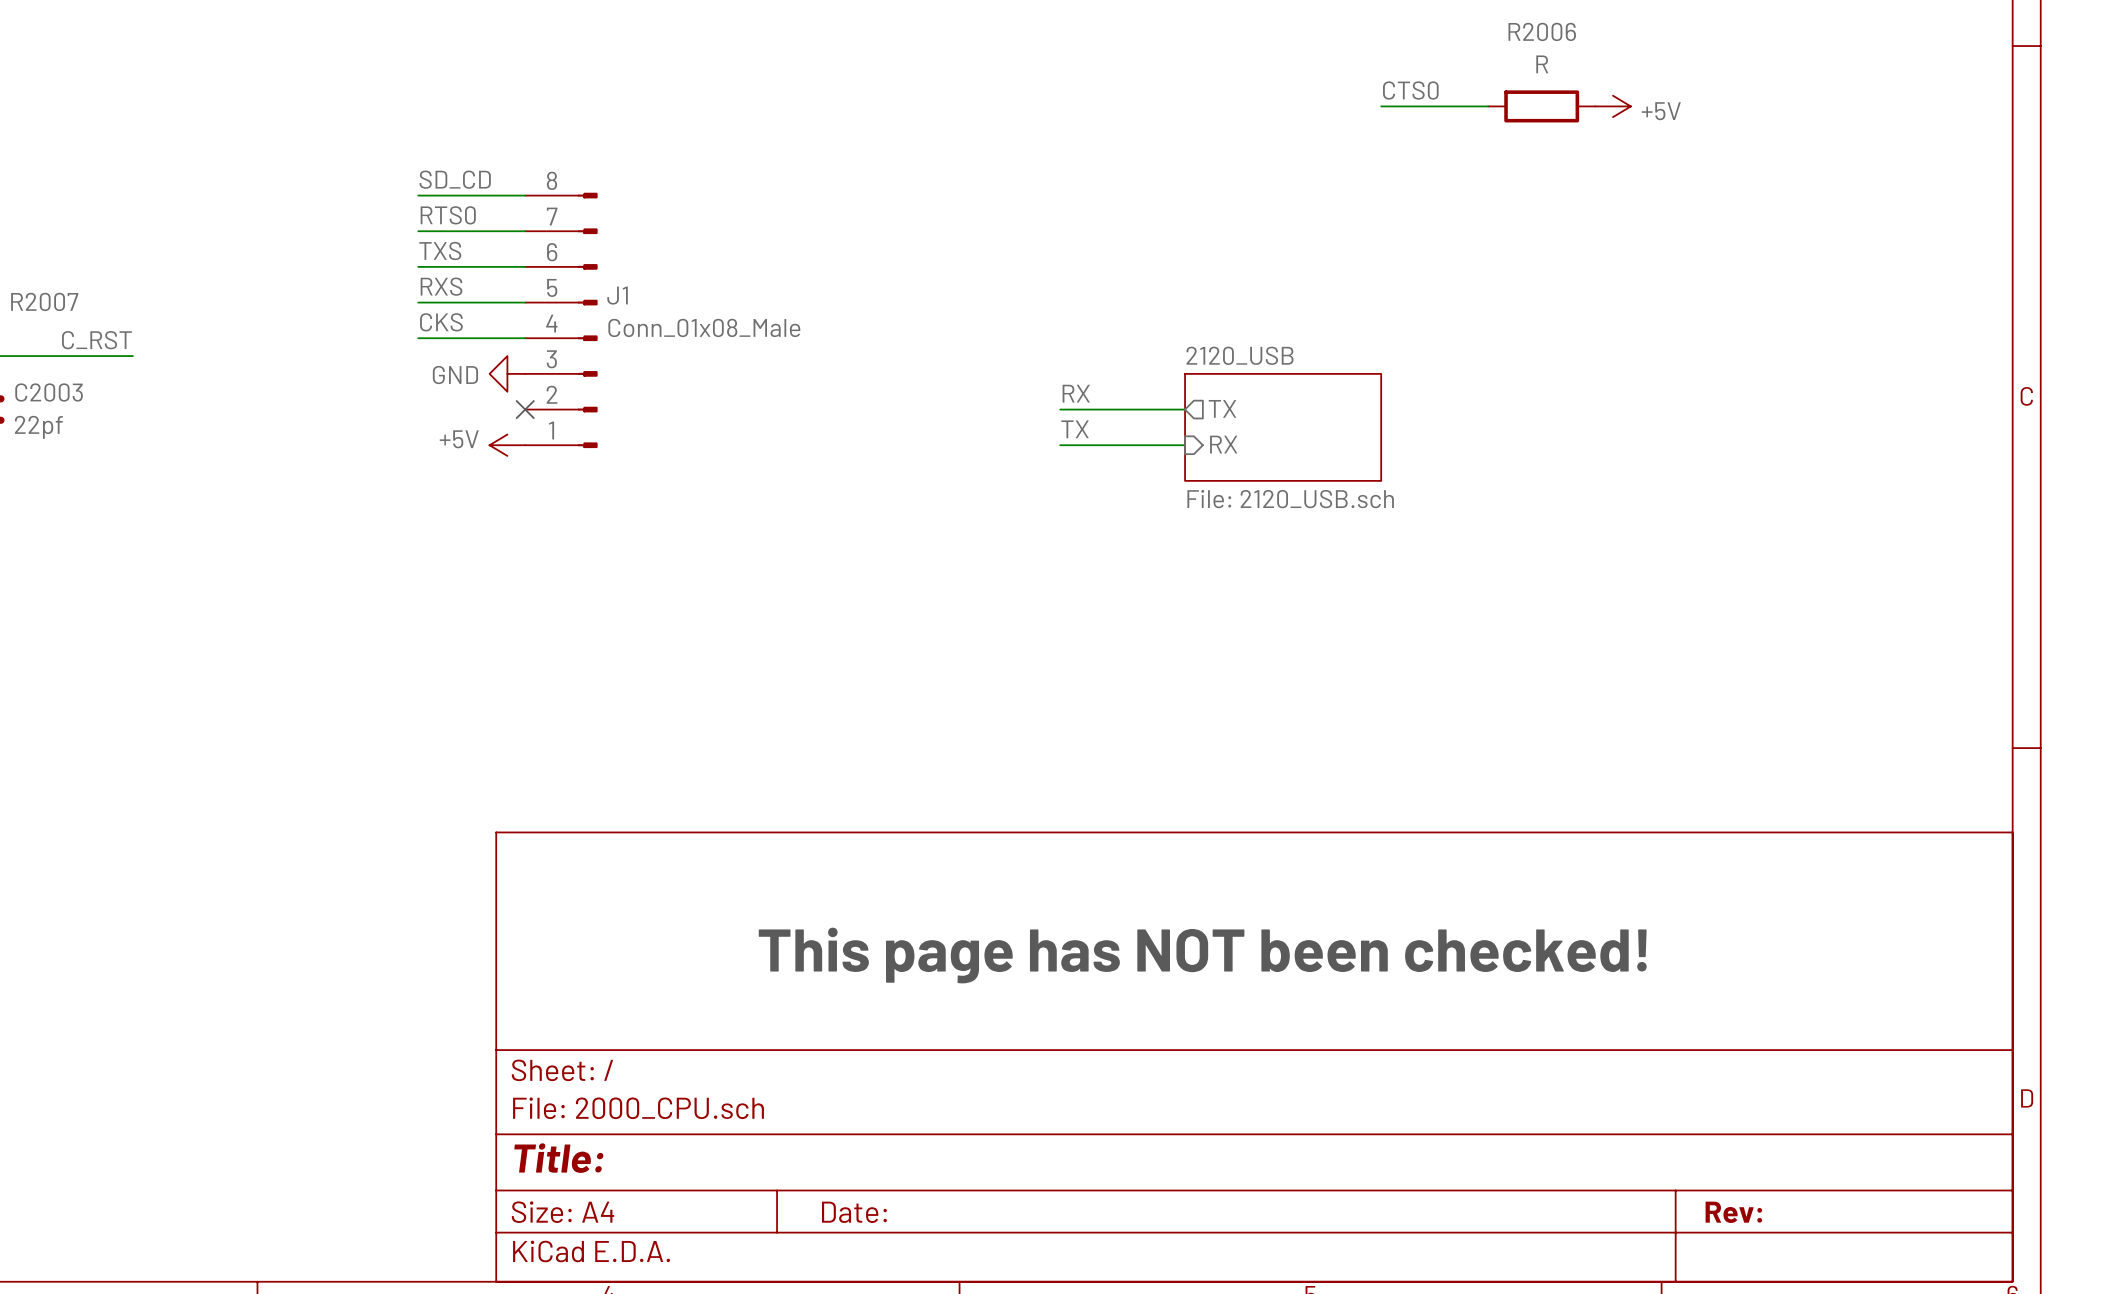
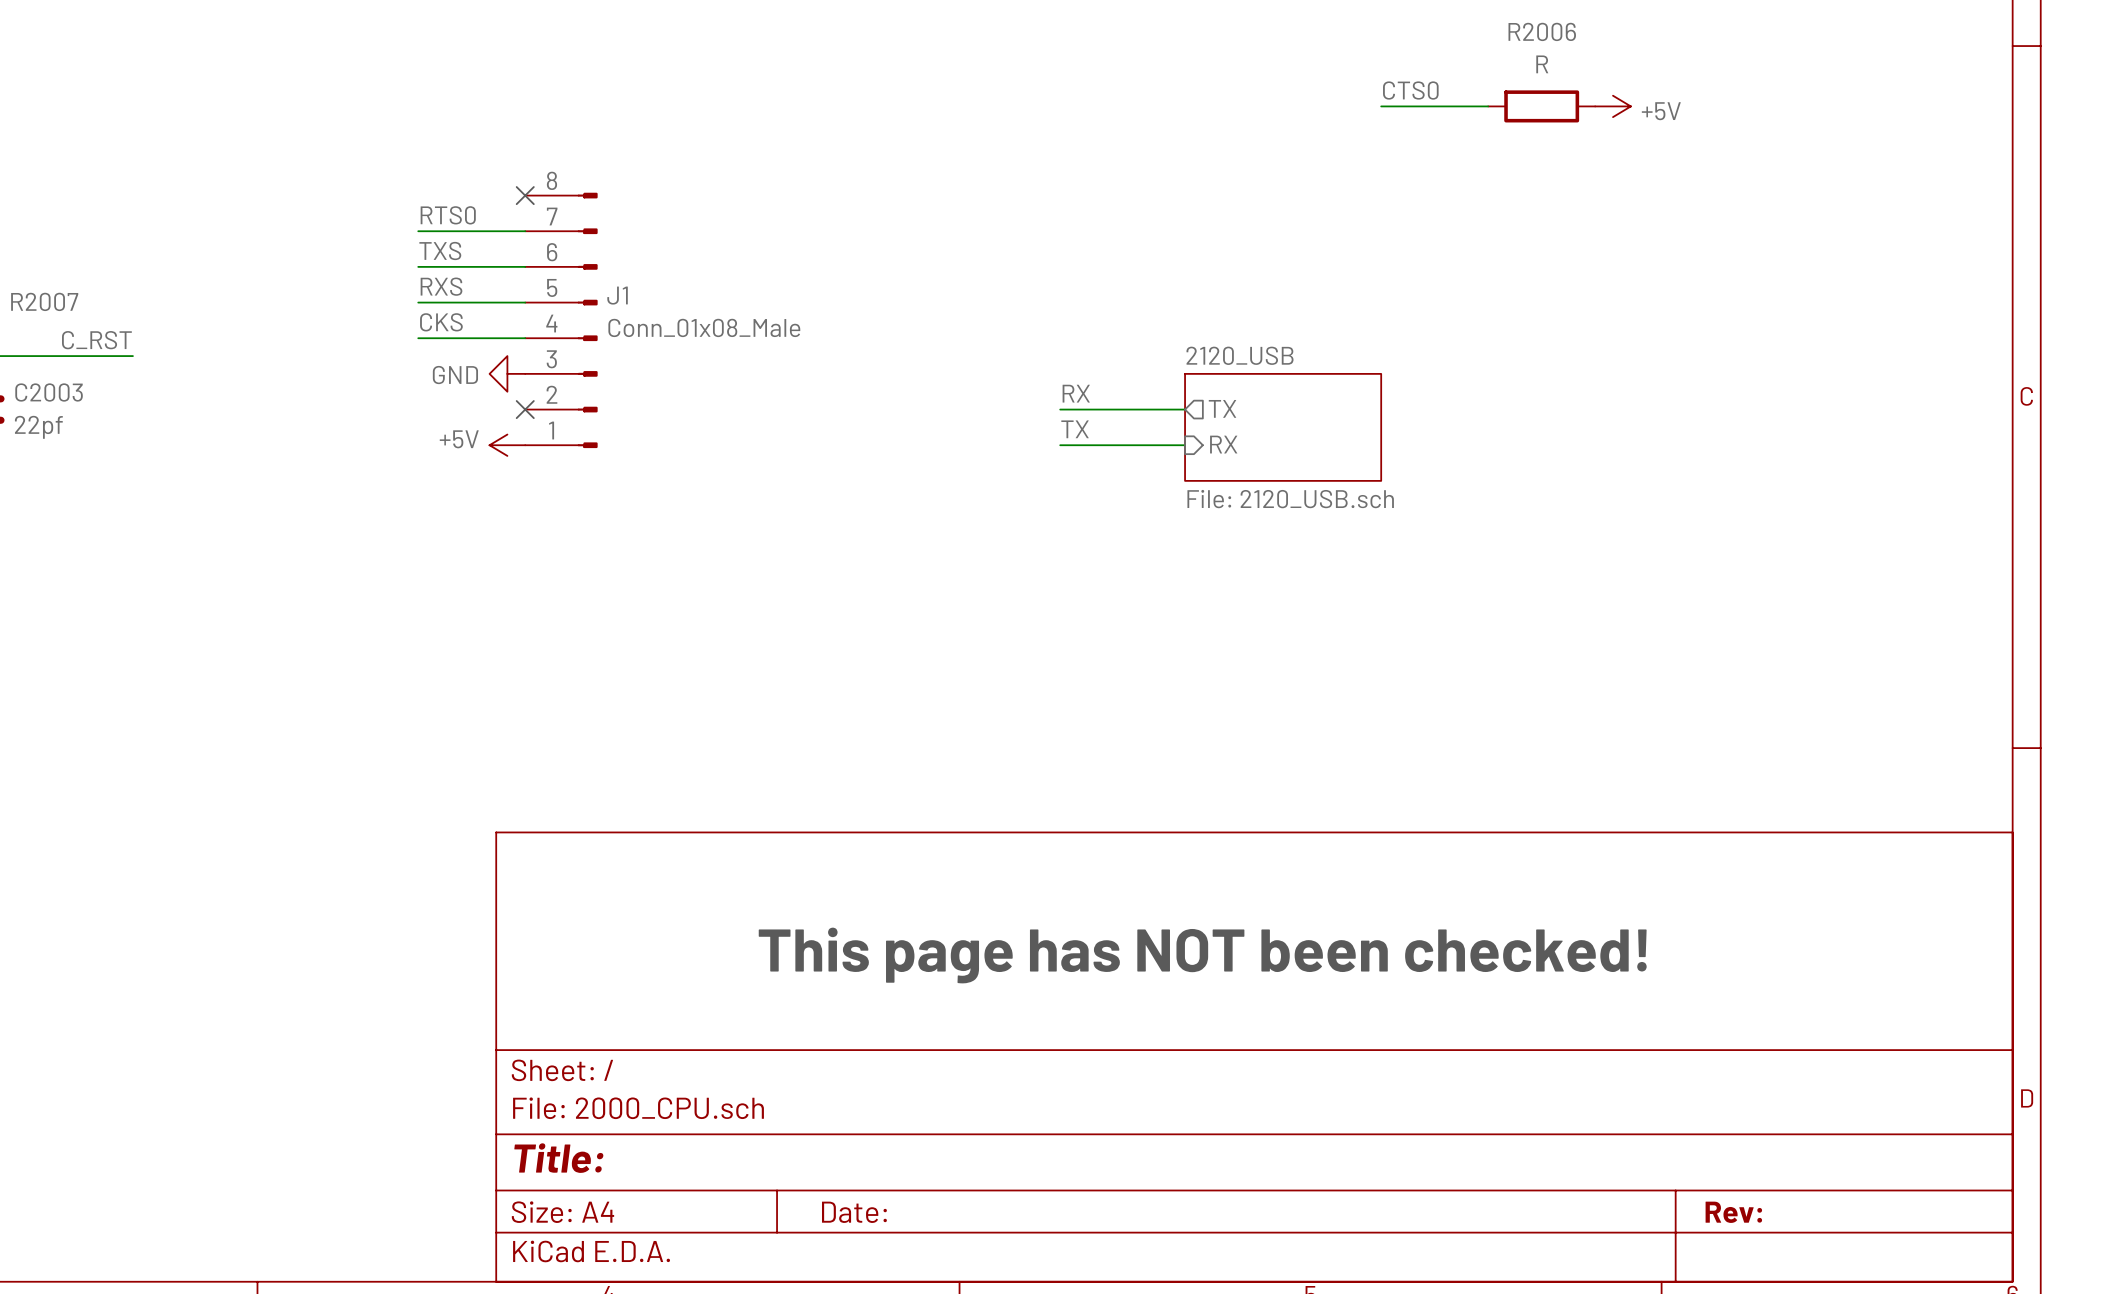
label: SD_CD (455, 179) -> none
wire: (418, 195) (525, 195) -> none
no-connect mark: none -> (525, 195)

